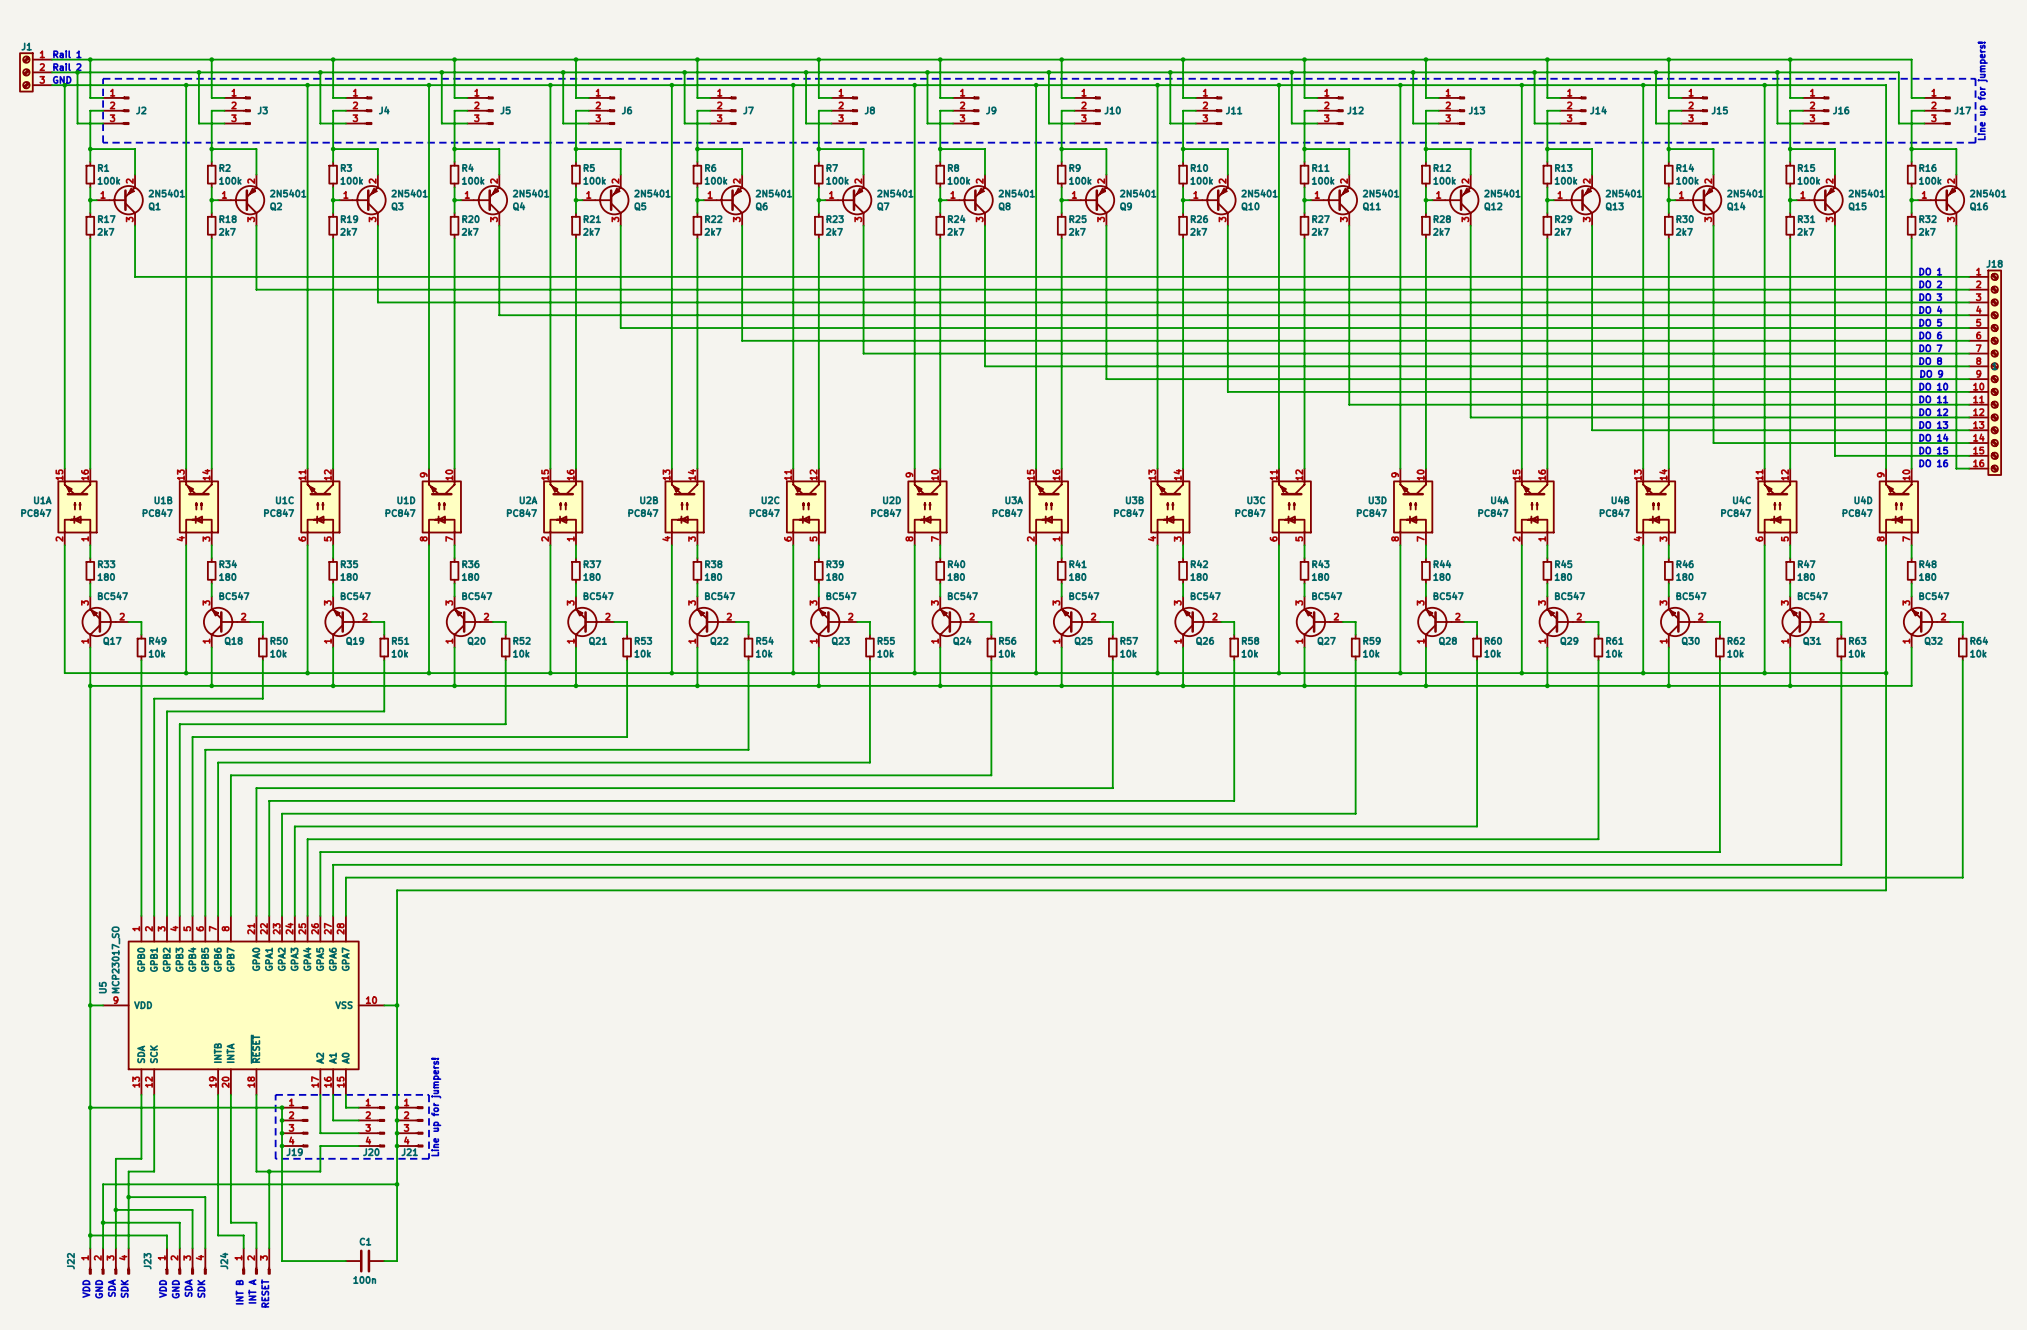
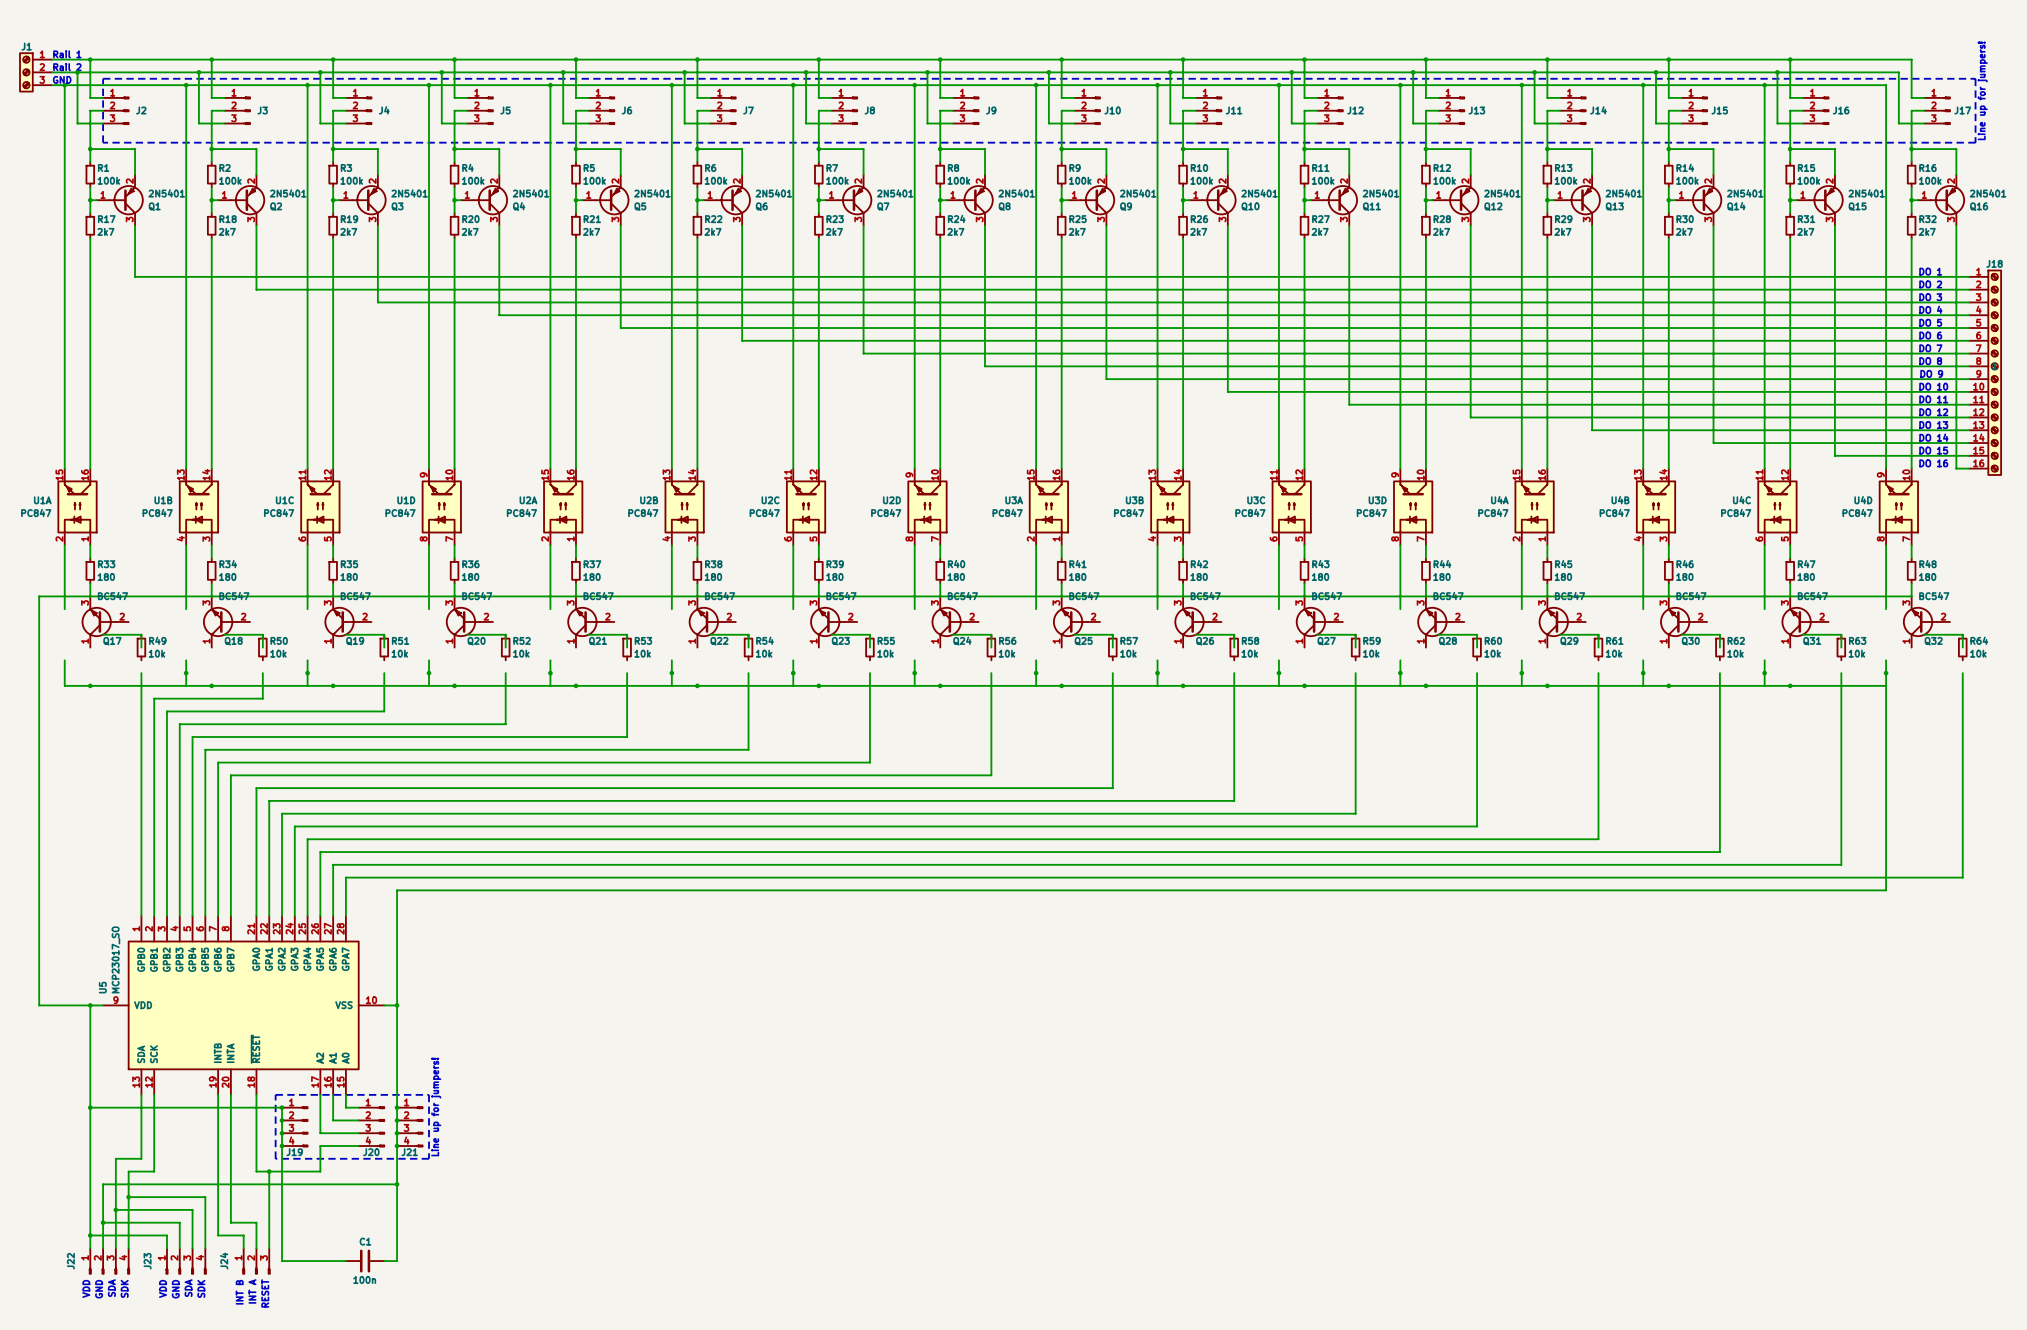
wire: (64, 609) (64, 660) -> none
wire: (186, 609) (186, 660) -> none
wire: (307, 609) (307, 660) -> none
wire: (429, 609) (429, 660) -> none
wire: (550, 609) (550, 660) -> none
wire: (671, 609) (671, 660) -> none
wire: (793, 609) (793, 660) -> none
wire: (914, 609) (914, 660) -> none
wire: (1036, 609) (1036, 660) -> none
wire: (1157, 609) (1157, 660) -> none
wire: (1278, 609) (1278, 660) -> none
wire: (1400, 609) (1400, 660) -> none
wire: (1521, 609) (1521, 660) -> none
wire: (1643, 609) (1643, 660) -> none
wire: (1764, 609) (1764, 660) -> none
wire: (1886, 609) (1886, 660) -> none
wire: (128, 621) (141, 621) (141, 634) -> none
wire: (250, 621) (262, 621) (262, 634) -> none
wire: (371, 621) (384, 621) (384, 634) -> none
wire: (492, 621) (505, 621) (505, 634) -> none
wire: (614, 621) (627, 621) (627, 634) -> none
wire: (735, 621) (748, 621) (748, 634) -> none
wire: (857, 621) (869, 621) (869, 634) -> none
wire: (978, 621) (991, 621) (991, 634) -> none
wire: (1100, 621) (1112, 621) (1112, 634) -> none
wire: (1221, 621) (1234, 621) (1234, 634) -> none
wire: (1342, 621) (1355, 621) (1355, 634) -> none
wire: (1464, 621) (1477, 621) (1477, 634) -> none
wire: (1585, 621) (1598, 621) (1598, 634) -> none
wire: (1707, 621) (1719, 621) (1719, 634) -> none
wire: (1828, 621) (1841, 621) (1841, 634) -> none
wire: (1949, 621) (1962, 621) (1962, 634) -> none
wire: none -> (103, 634) (141, 634) (141, 647)
wire: none -> (224, 634) (262, 634) (262, 647)
wire: none -> (345, 634) (384, 634) (384, 647)
wire: none -> (467, 634) (505, 634) (505, 647)
wire: none -> (588, 634) (627, 634) (627, 647)
wire: none -> (710, 634) (748, 634) (748, 647)
wire: none -> (831, 634) (869, 634) (869, 647)
wire: none -> (953, 634) (991, 634) (991, 647)
wire: none -> (1074, 634) (1112, 634) (1112, 647)
wire: none -> (1195, 634) (1234, 634) (1234, 647)
wire: none -> (1317, 634) (1355, 634) (1355, 647)
wire: none -> (1438, 634) (1477, 634) (1477, 647)
wire: none -> (1560, 634) (1598, 634) (1598, 647)
wire: none -> (1681, 634) (1719, 634) (1719, 647)
wire: none -> (1802, 634) (1841, 634) (1841, 647)
wire: none -> (1924, 634) (1962, 634) (1962, 647)
wire: (90, 647) (90, 1005) -> (1911, 596) (39, 596) (39, 1005) (90, 1005)
wire: (211, 647) (211, 685) -> none
wire: (333, 647) (333, 685) -> none
wire: (454, 647) (454, 685) -> none
wire: (575, 647) (575, 685) -> none
wire: (697, 647) (697, 685) -> none
wire: (818, 647) (818, 685) -> none
wire: (940, 647) (940, 685) -> none
wire: (1061, 647) (1061, 685) -> none
wire: (1183, 647) (1183, 685) -> none
wire: (1304, 647) (1304, 685) -> none
wire: (1425, 647) (1425, 685) -> none
wire: (1547, 647) (1547, 685) -> none
wire: (1668, 647) (1668, 685) -> none
wire: (1790, 647) (1790, 685) -> none
wire: (1911, 647) (1911, 685) (1886, 685) -> none
wire: (141, 660) (141, 673) -> (186, 673) (186, 685)
wire: (262, 660) (262, 673) -> (307, 673) (307, 685)
wire: (384, 660) (384, 673) -> (429, 673) (429, 685)
wire: (505, 660) (505, 673) -> (550, 673) (550, 685)
wire: (627, 660) (627, 673) -> (671, 673) (671, 685)
wire: (748, 660) (748, 673) -> (793, 673) (793, 685)
wire: (869, 660) (869, 673) -> (914, 673) (914, 685)
wire: (991, 660) (991, 673) -> (1036, 673) (1036, 685)
wire: (1112, 660) (1112, 673) -> (1157, 673) (1157, 685)
wire: (1234, 660) (1234, 673) -> (1278, 673) (1278, 685)
wire: (1355, 660) (1355, 673) -> (1400, 673) (1400, 685)
wire: (1477, 660) (1477, 673) -> (1521, 673) (1521, 685)
wire: (1598, 660) (1598, 673) -> (1643, 673) (1643, 685)
wire: (1719, 660) (1719, 673) -> (1764, 673) (1764, 685)
wire: (1841, 660) (1841, 673) -> none
wire: (1962, 660) (1962, 673) -> none
wire: (64, 673) (1886, 673) -> (64, 673) (64, 685) (90, 685)

